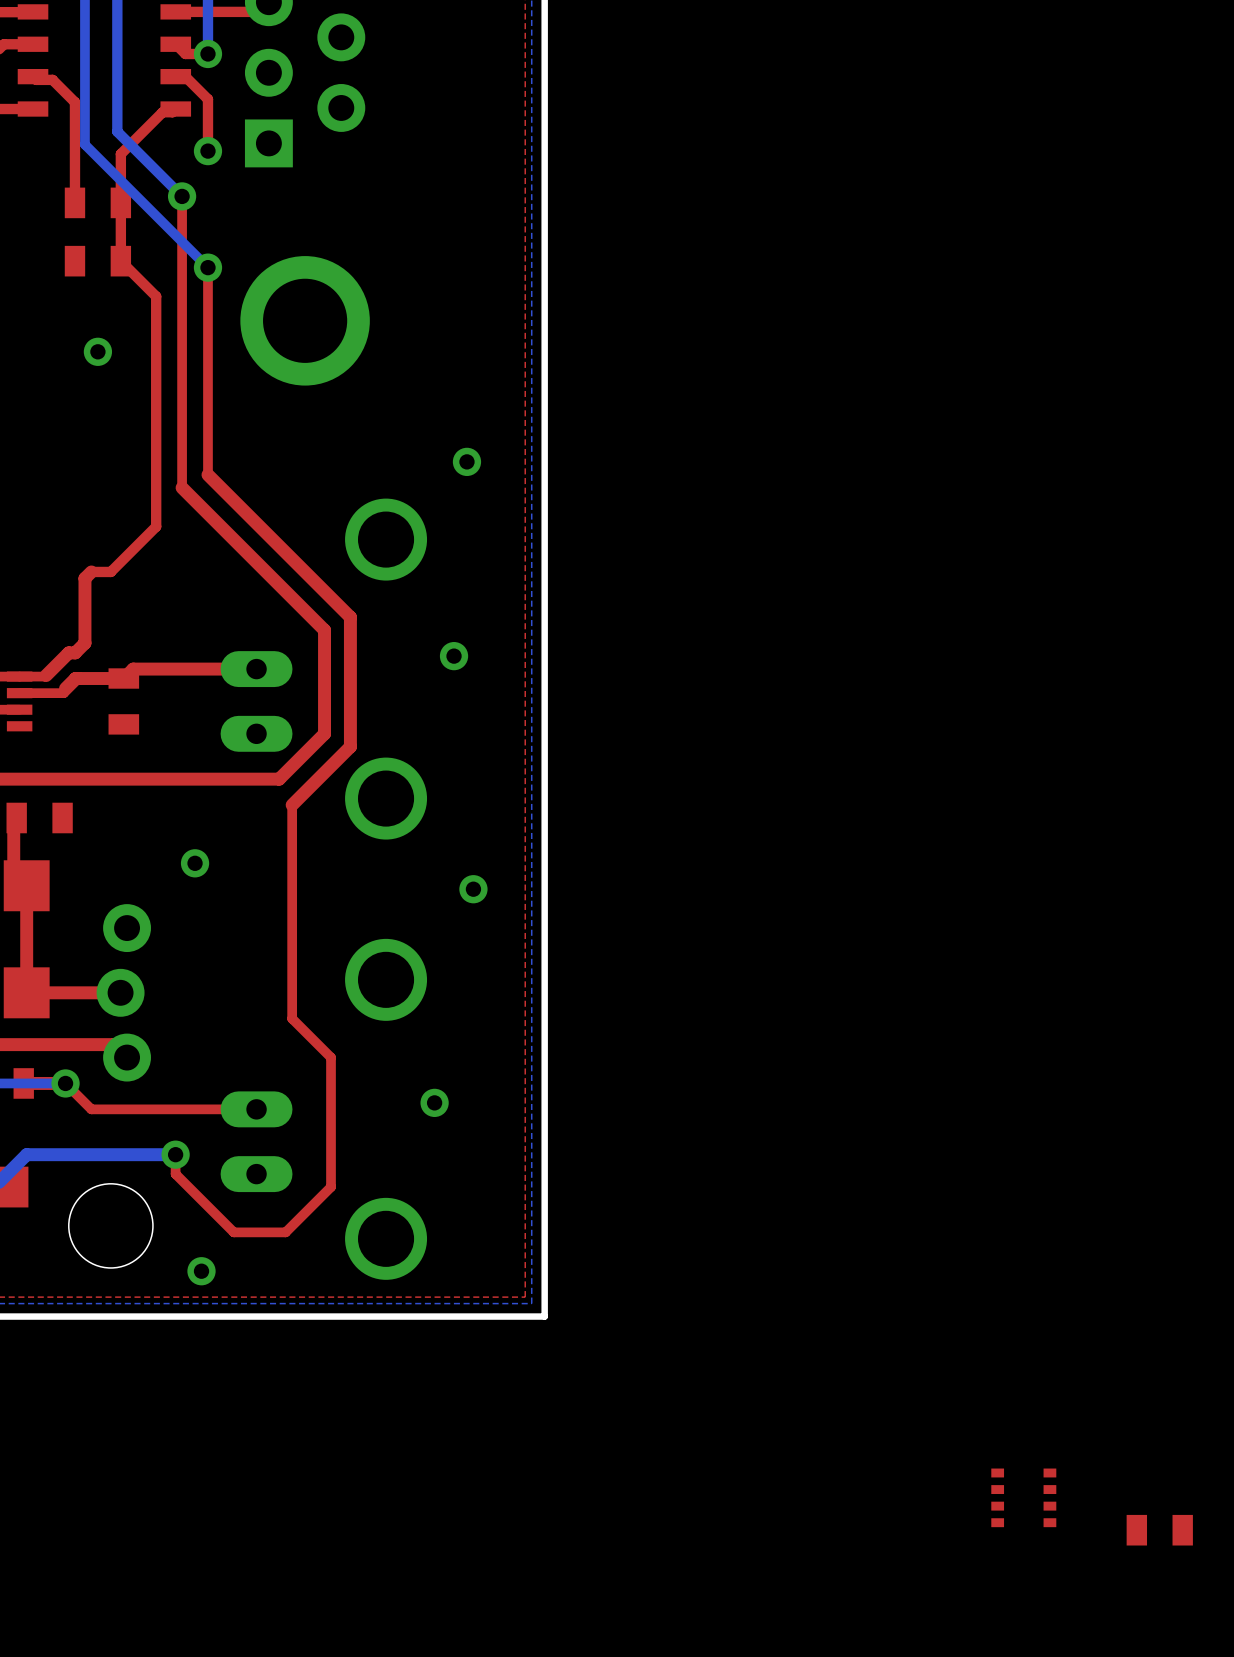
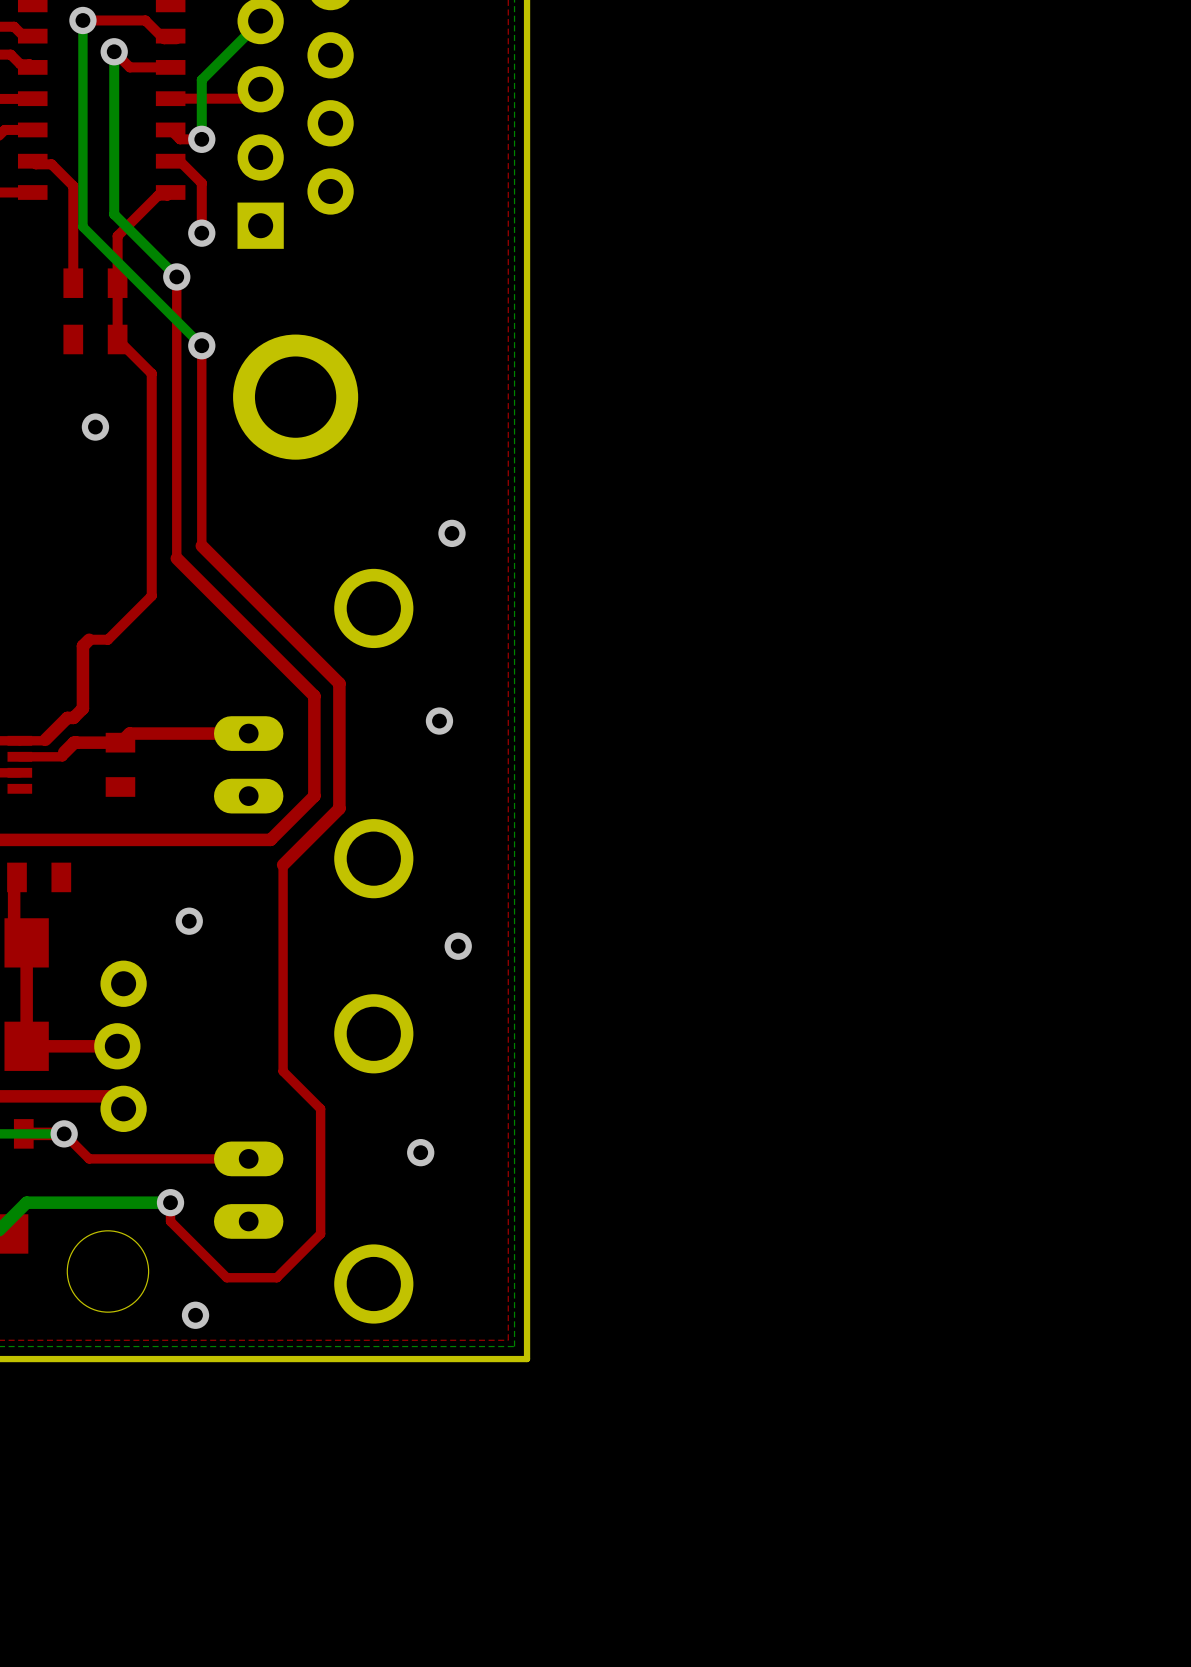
part: (1023, 1497) -> none
part: (1159, 1530) -> none

